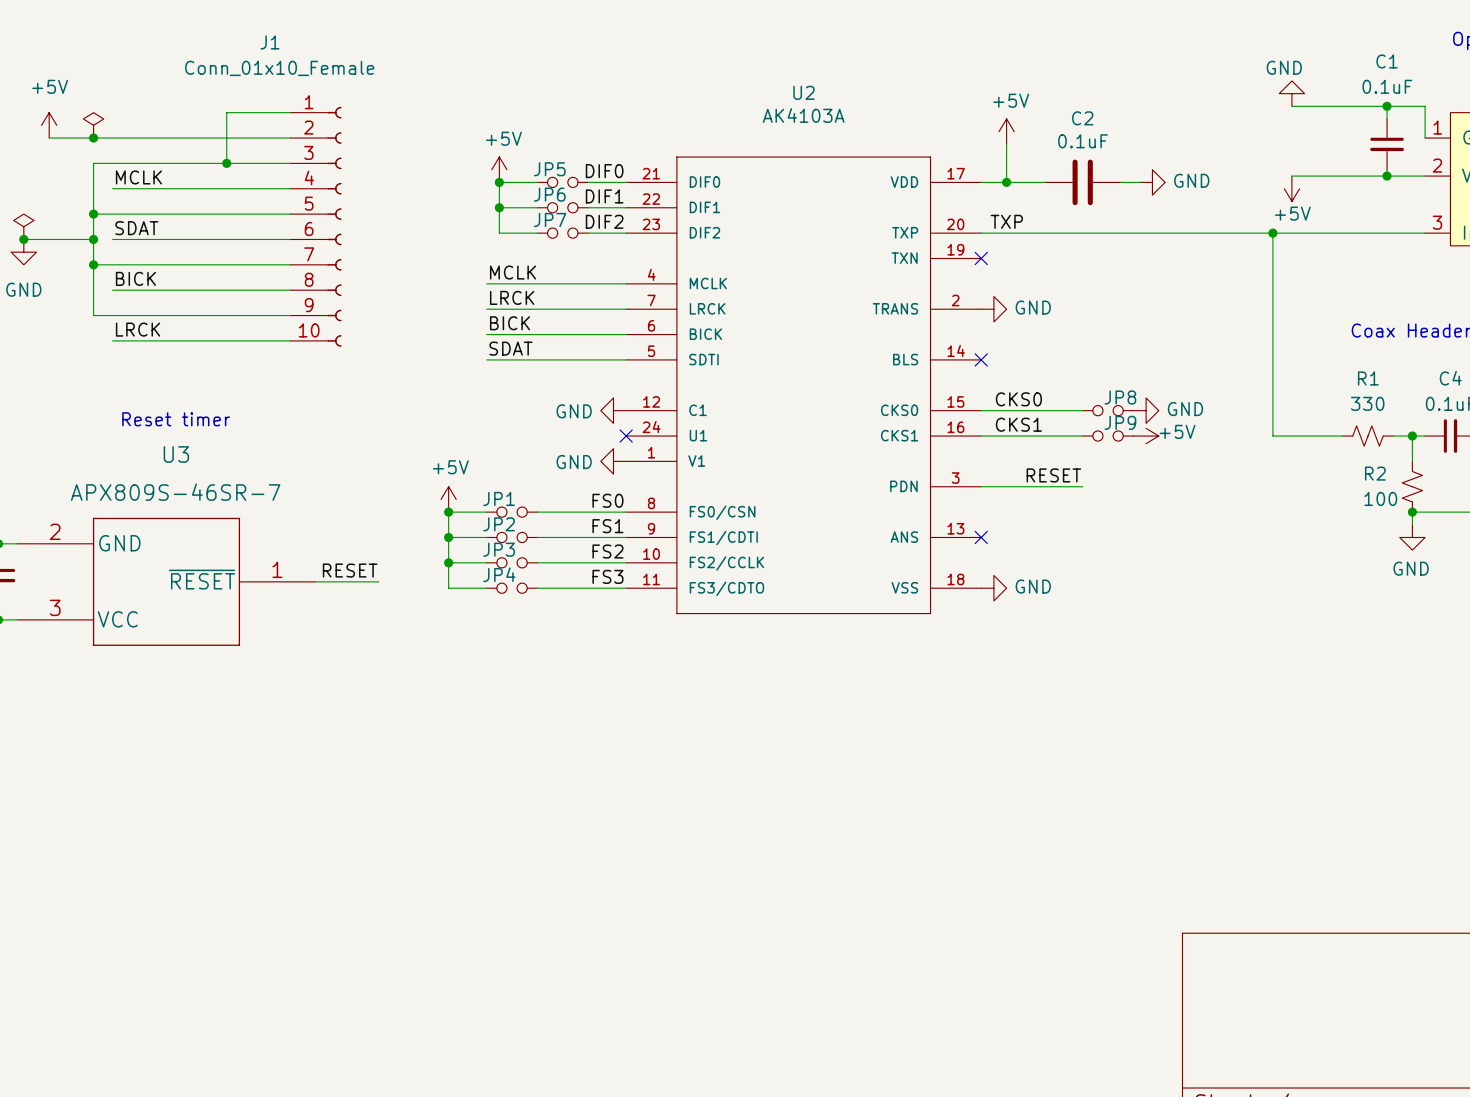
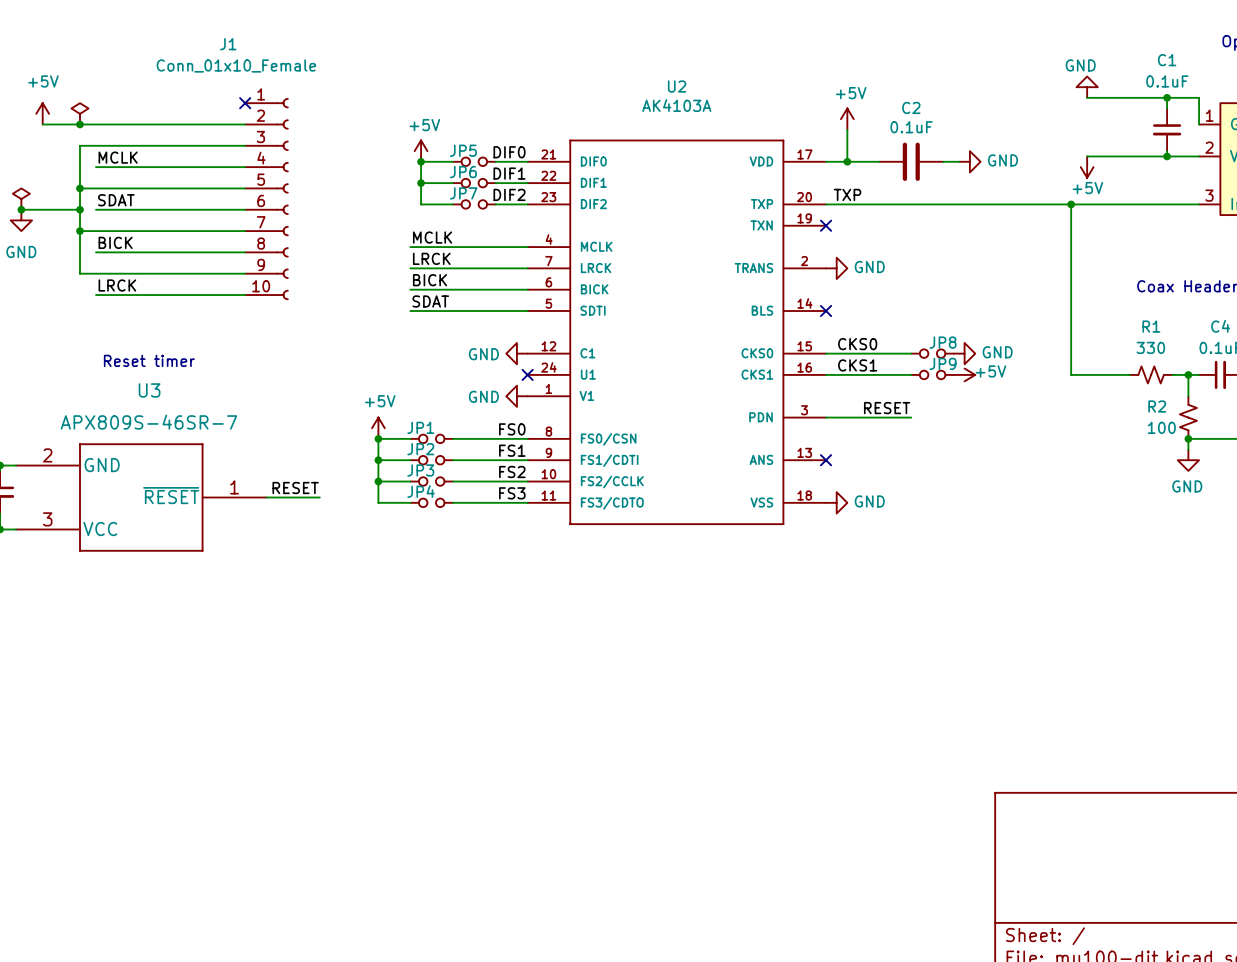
wire: (290, 112) (226, 112) (226, 163) -> none
no-connect mark: none -> (245, 103)
junction: (226, 163) -> none

